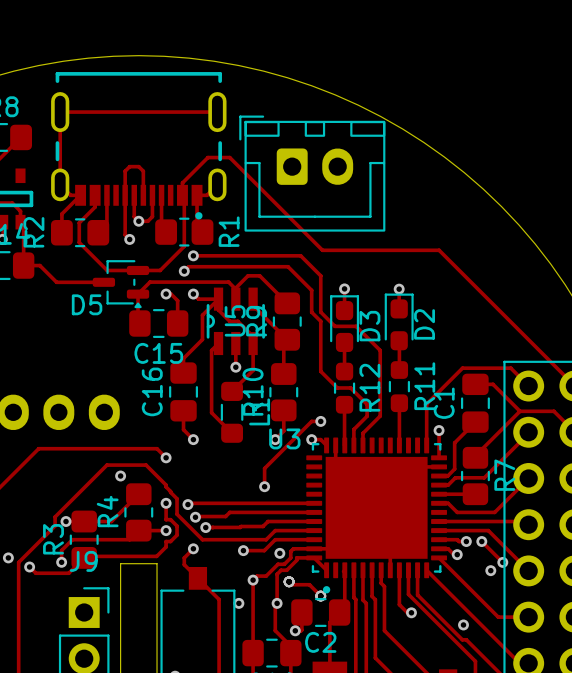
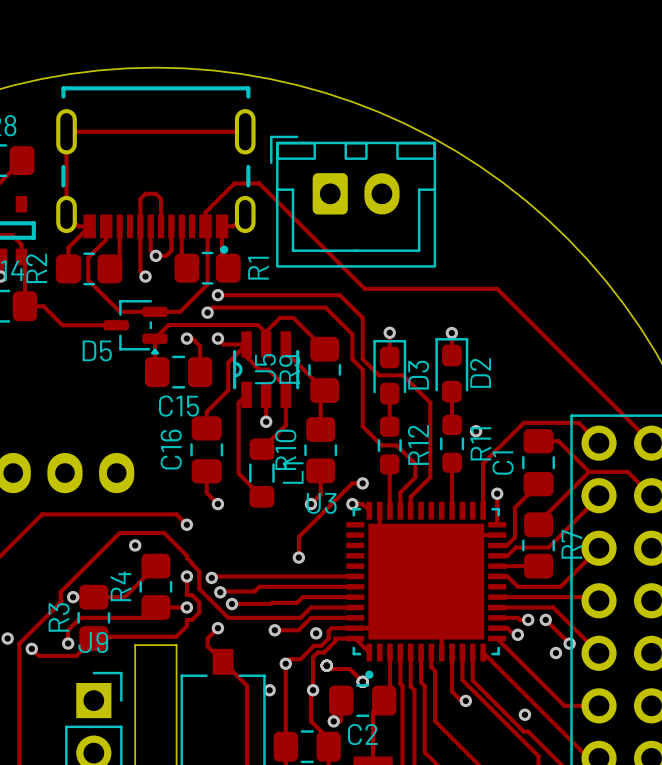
via: none -> (476, 431)

